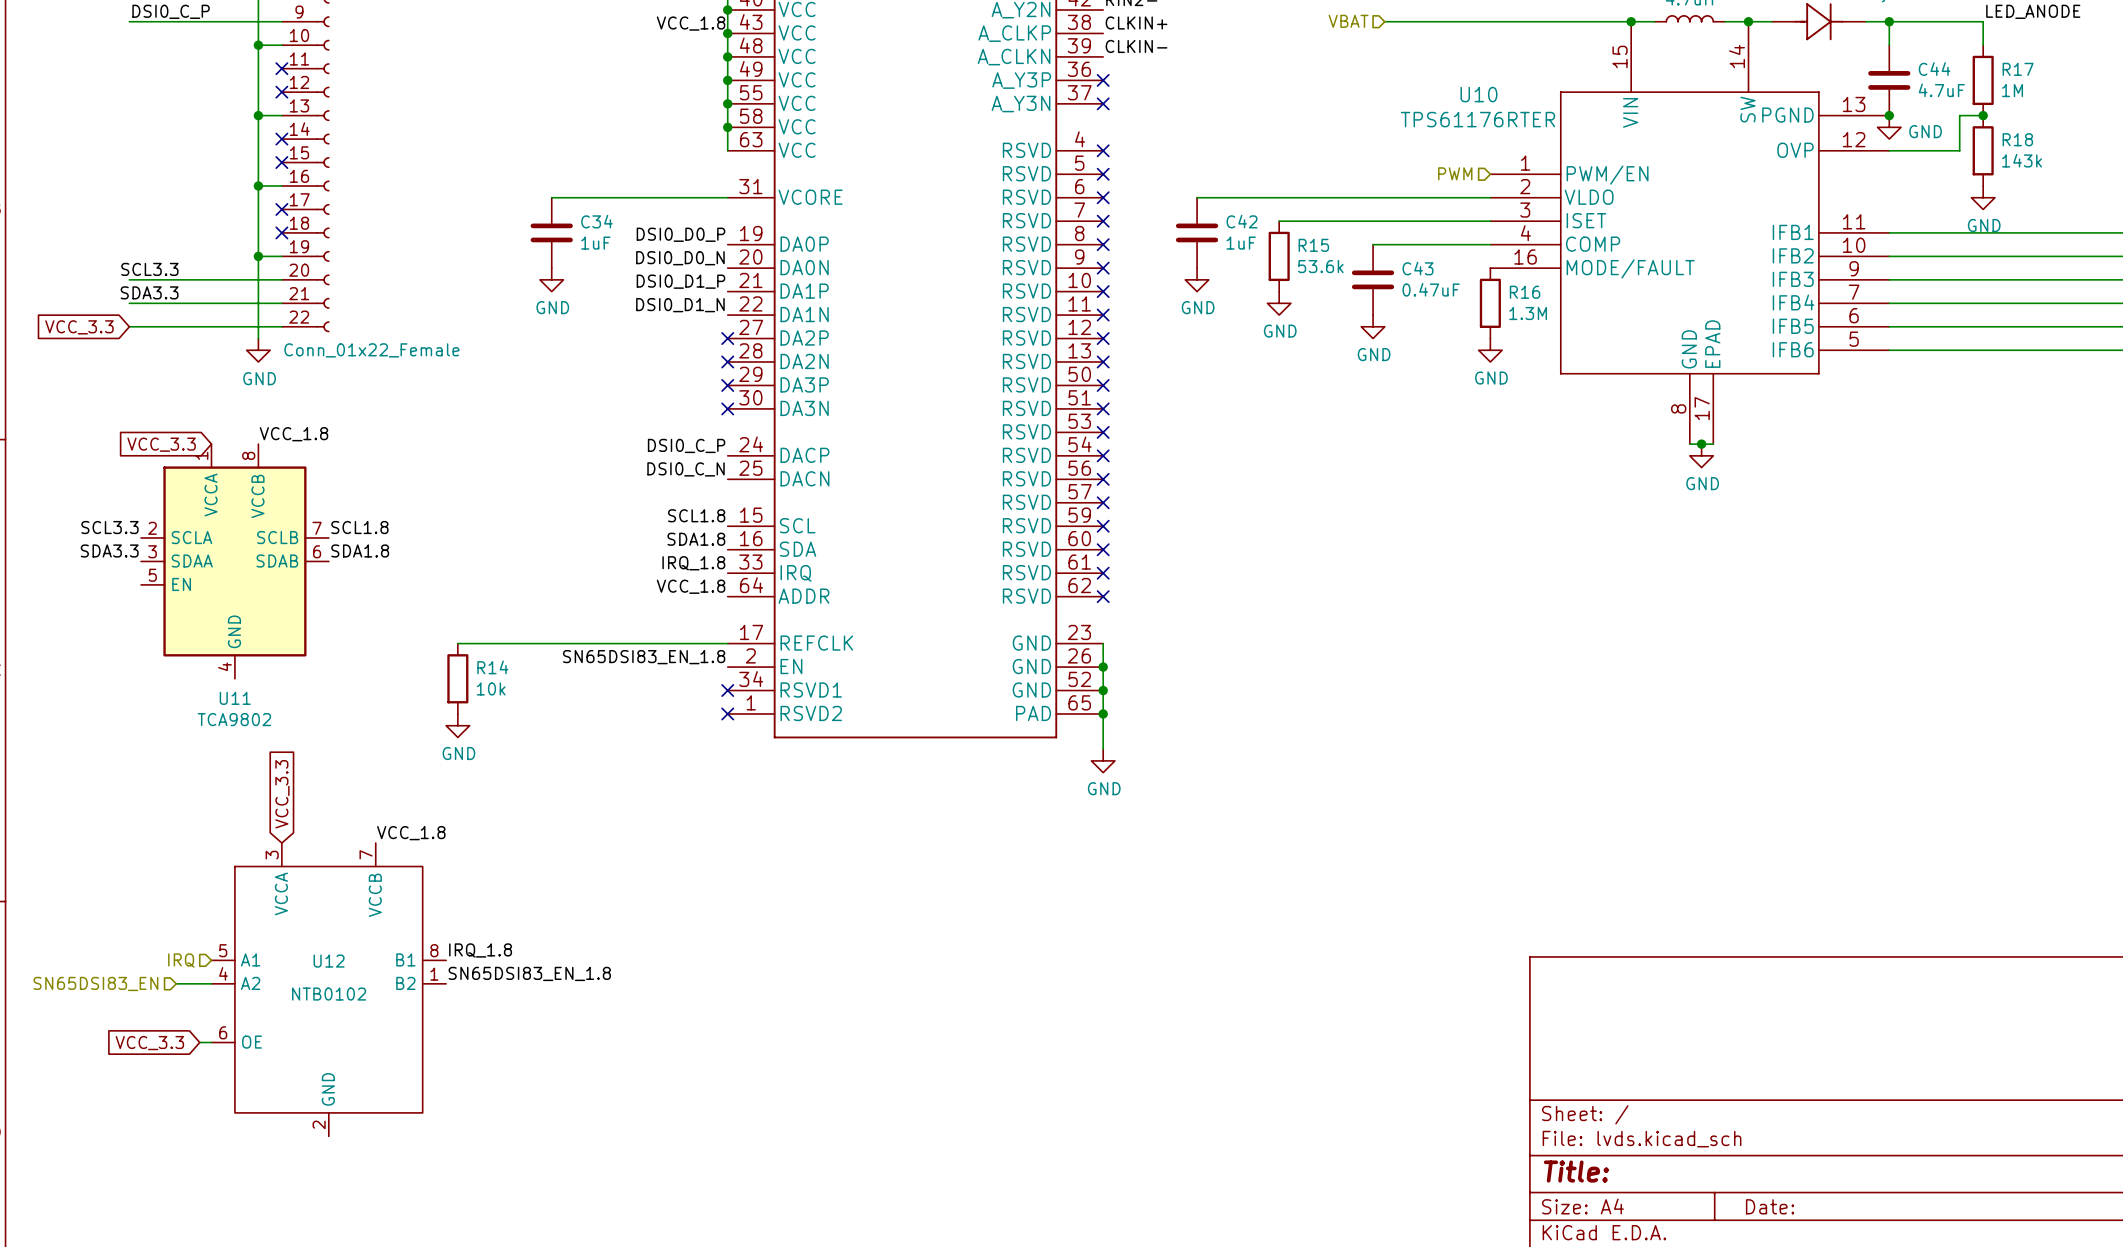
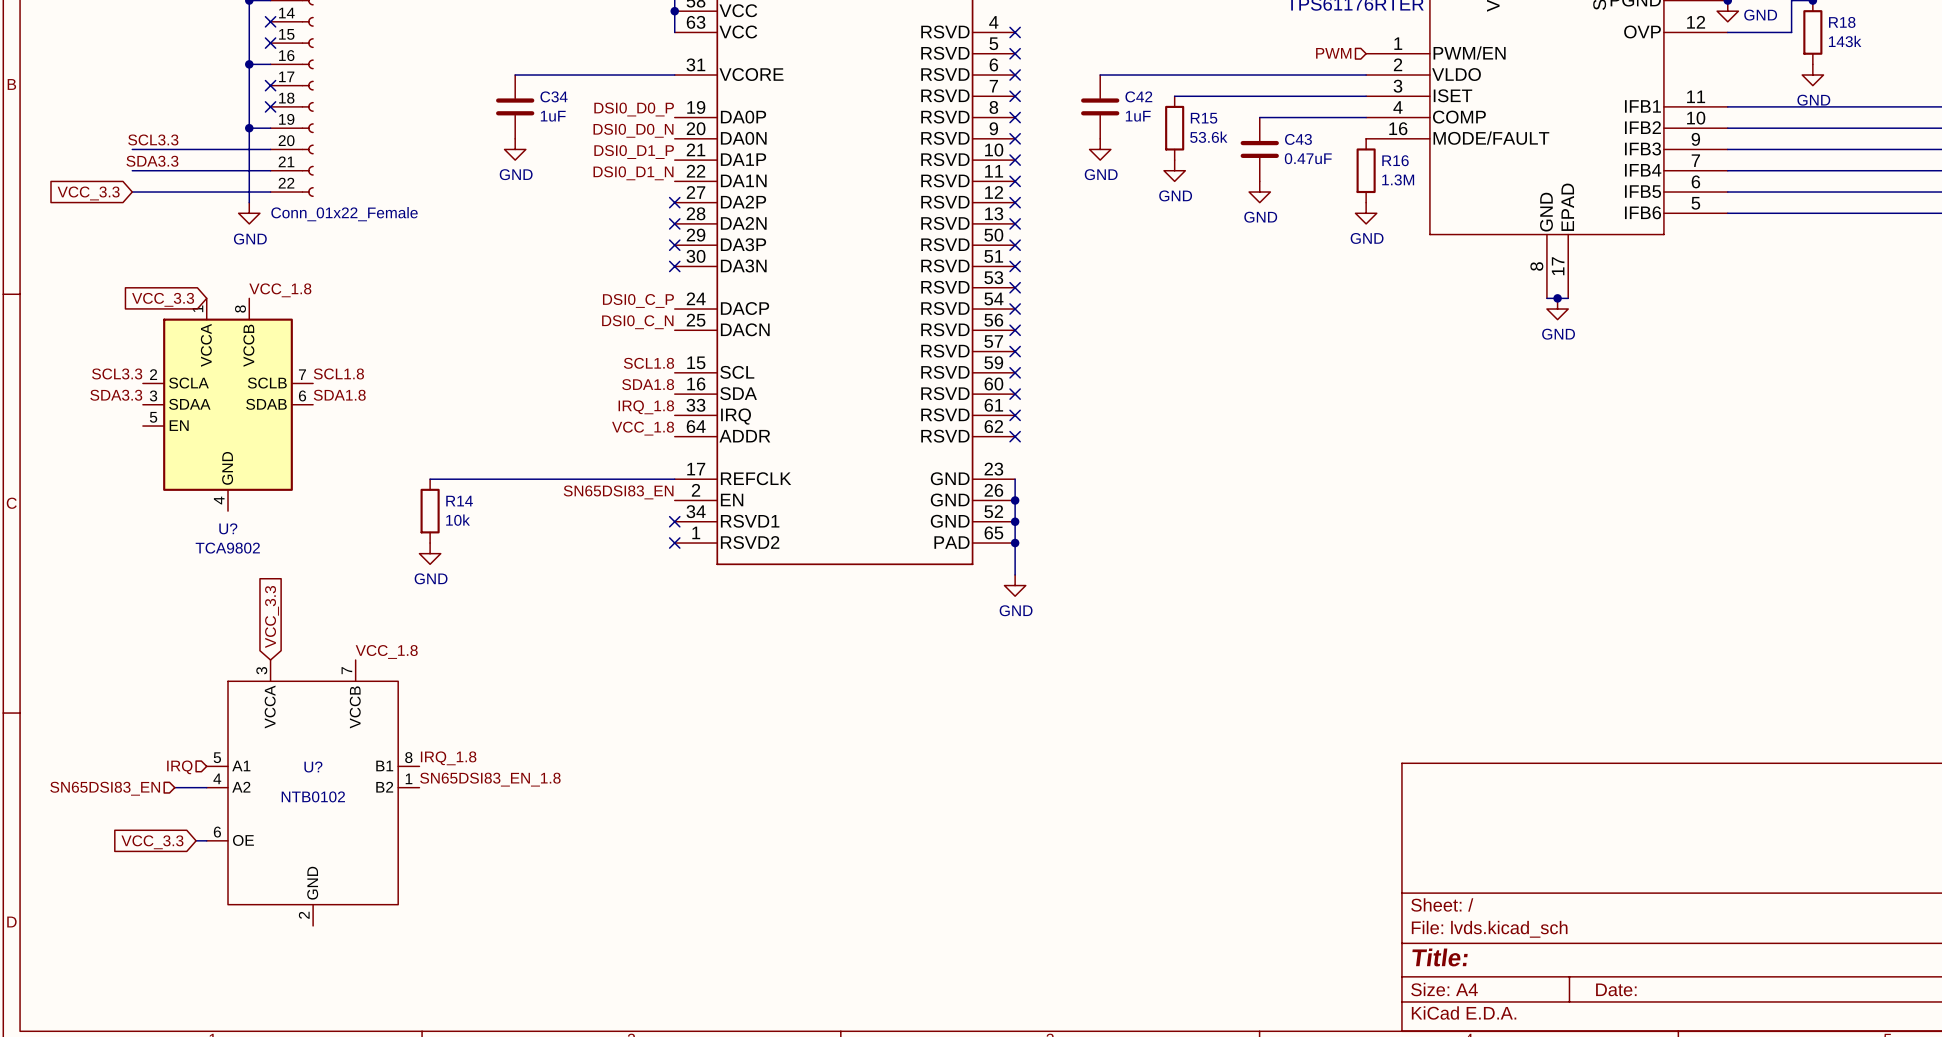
label: SN65DSI83_EN_1.8 (644, 657) -> SN65DSI83_EN (618, 492)
U11 name: U11 (235, 698) -> U? (228, 528)
U12 name: U12 (329, 961) -> U? (313, 767)

